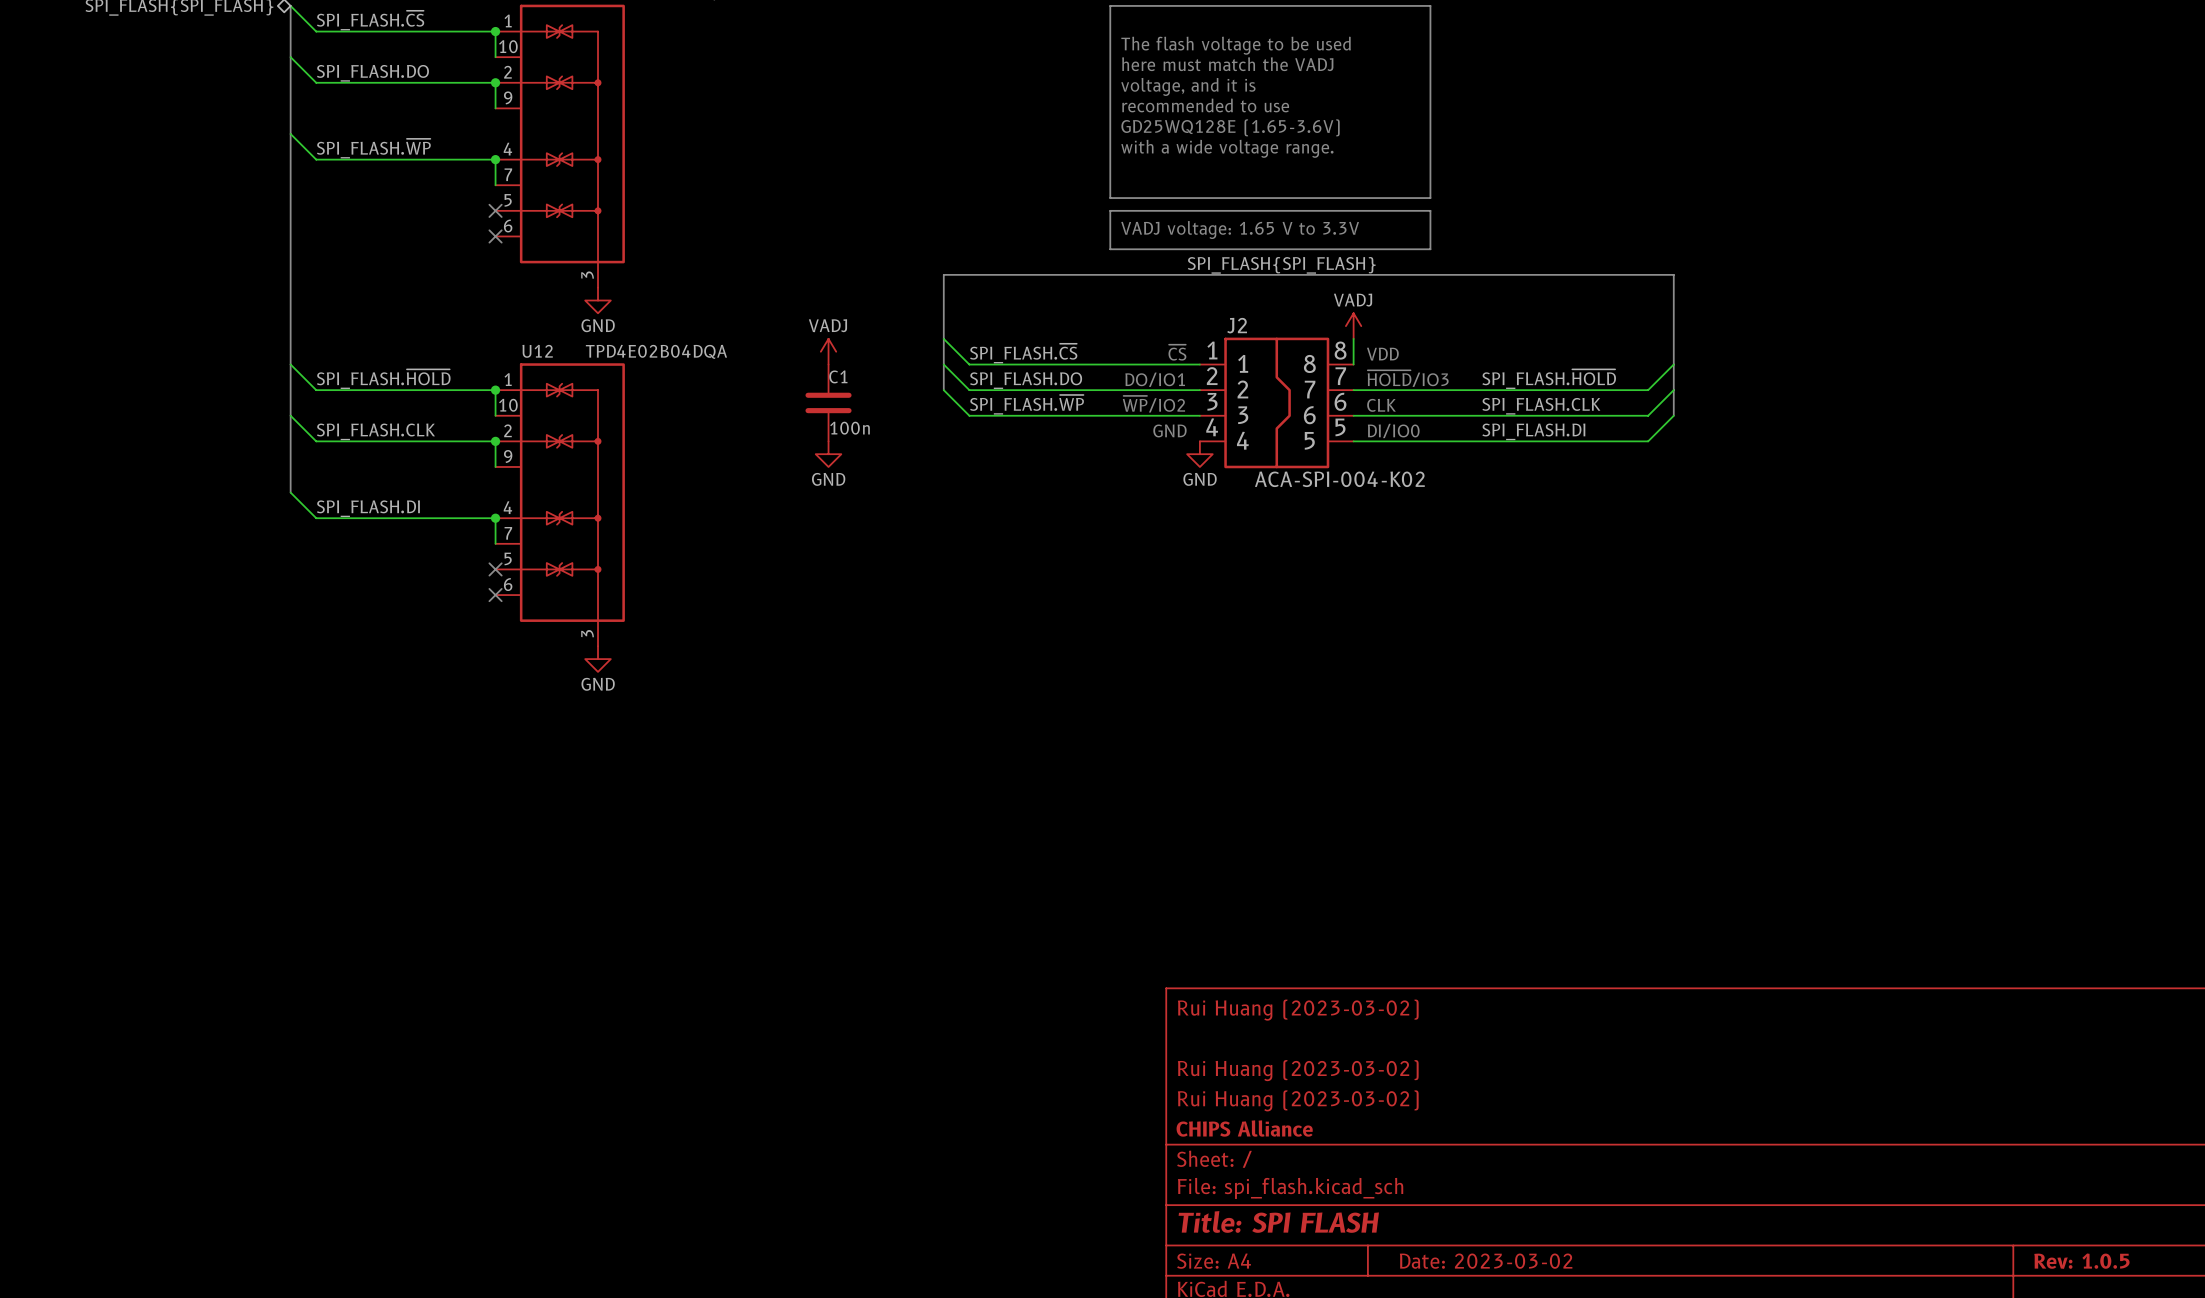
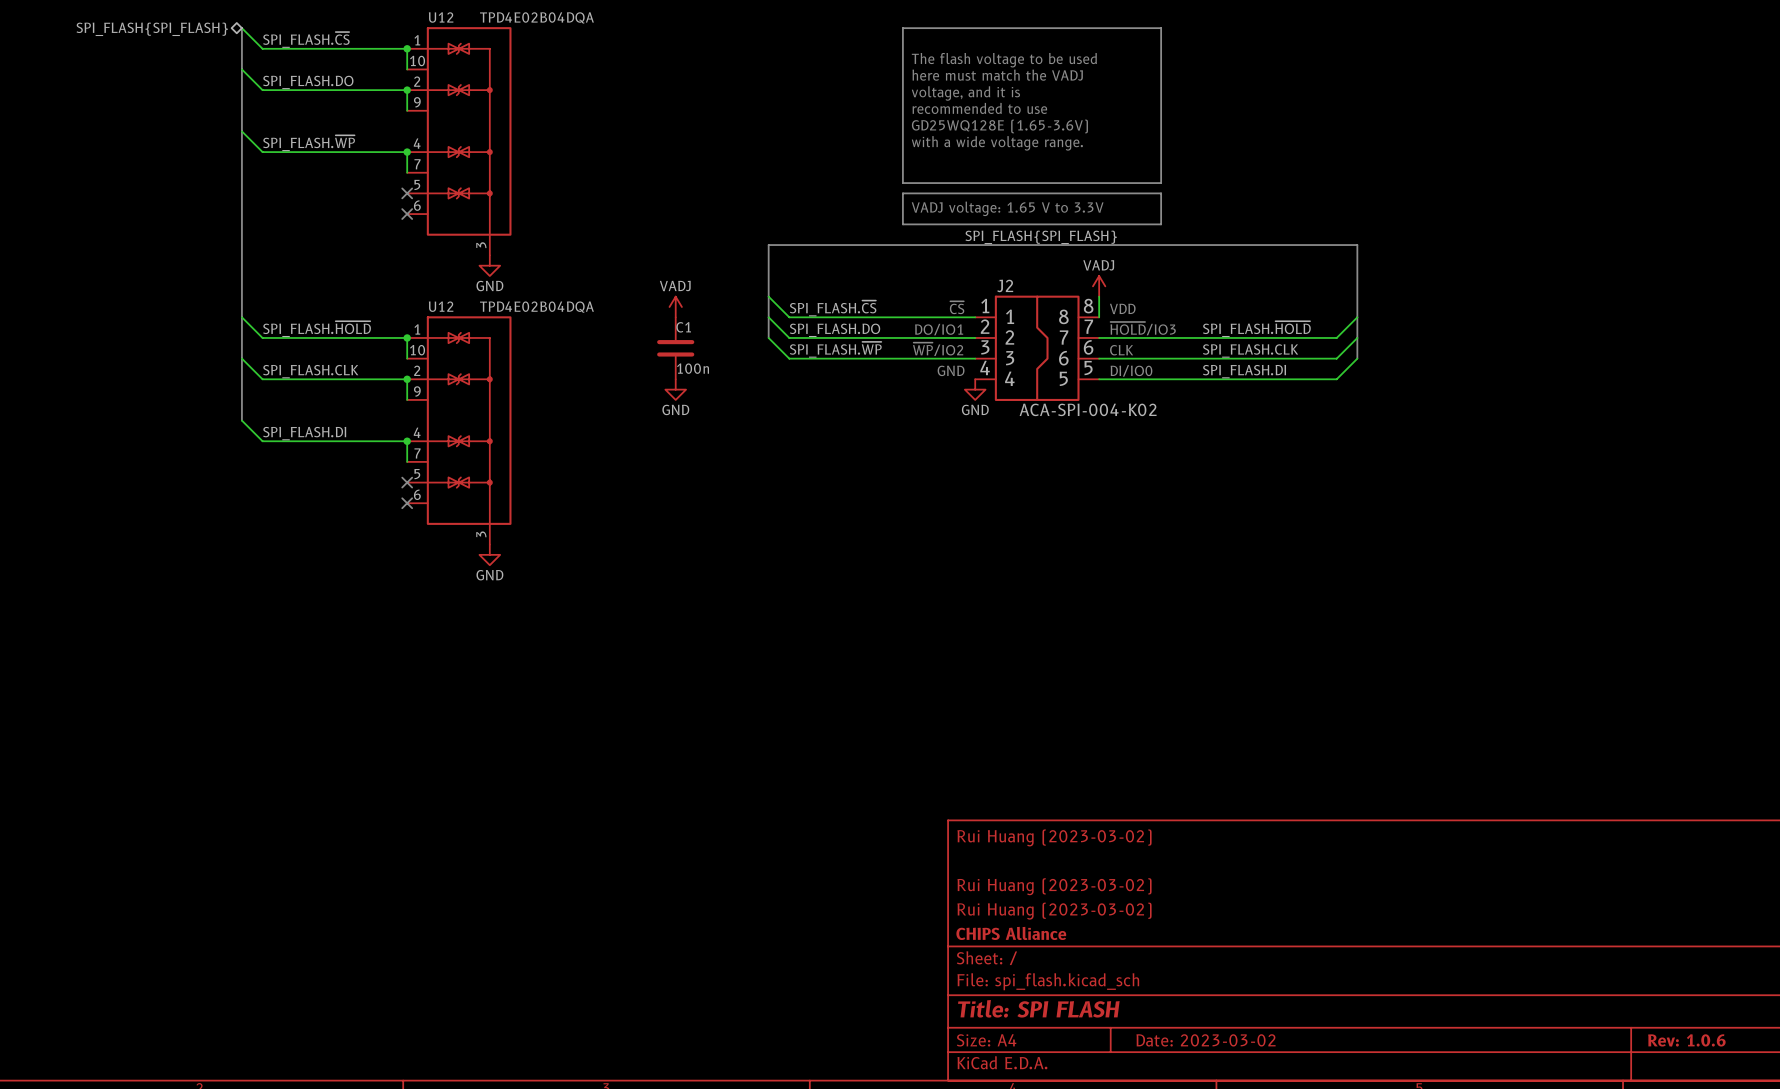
title block: Rev: 1.0.5 (2081, 1261) -> Rev: 1.0.6 (1686, 1040)

